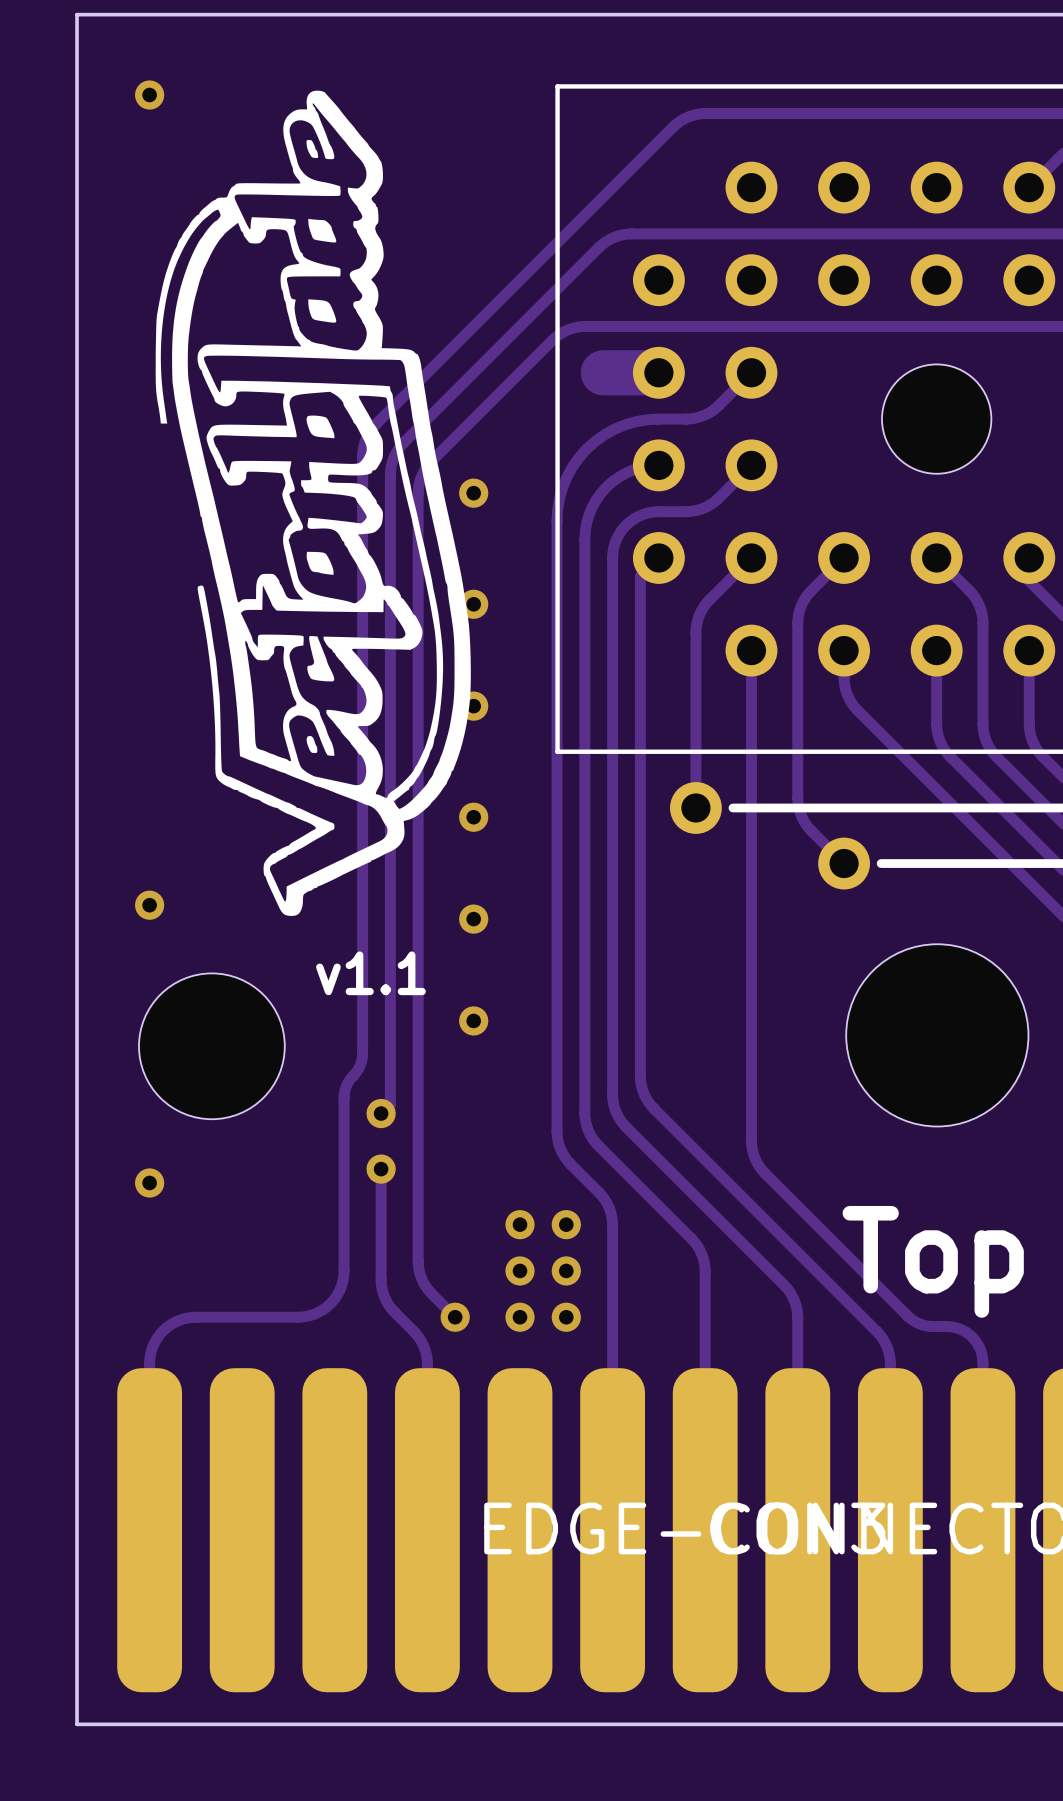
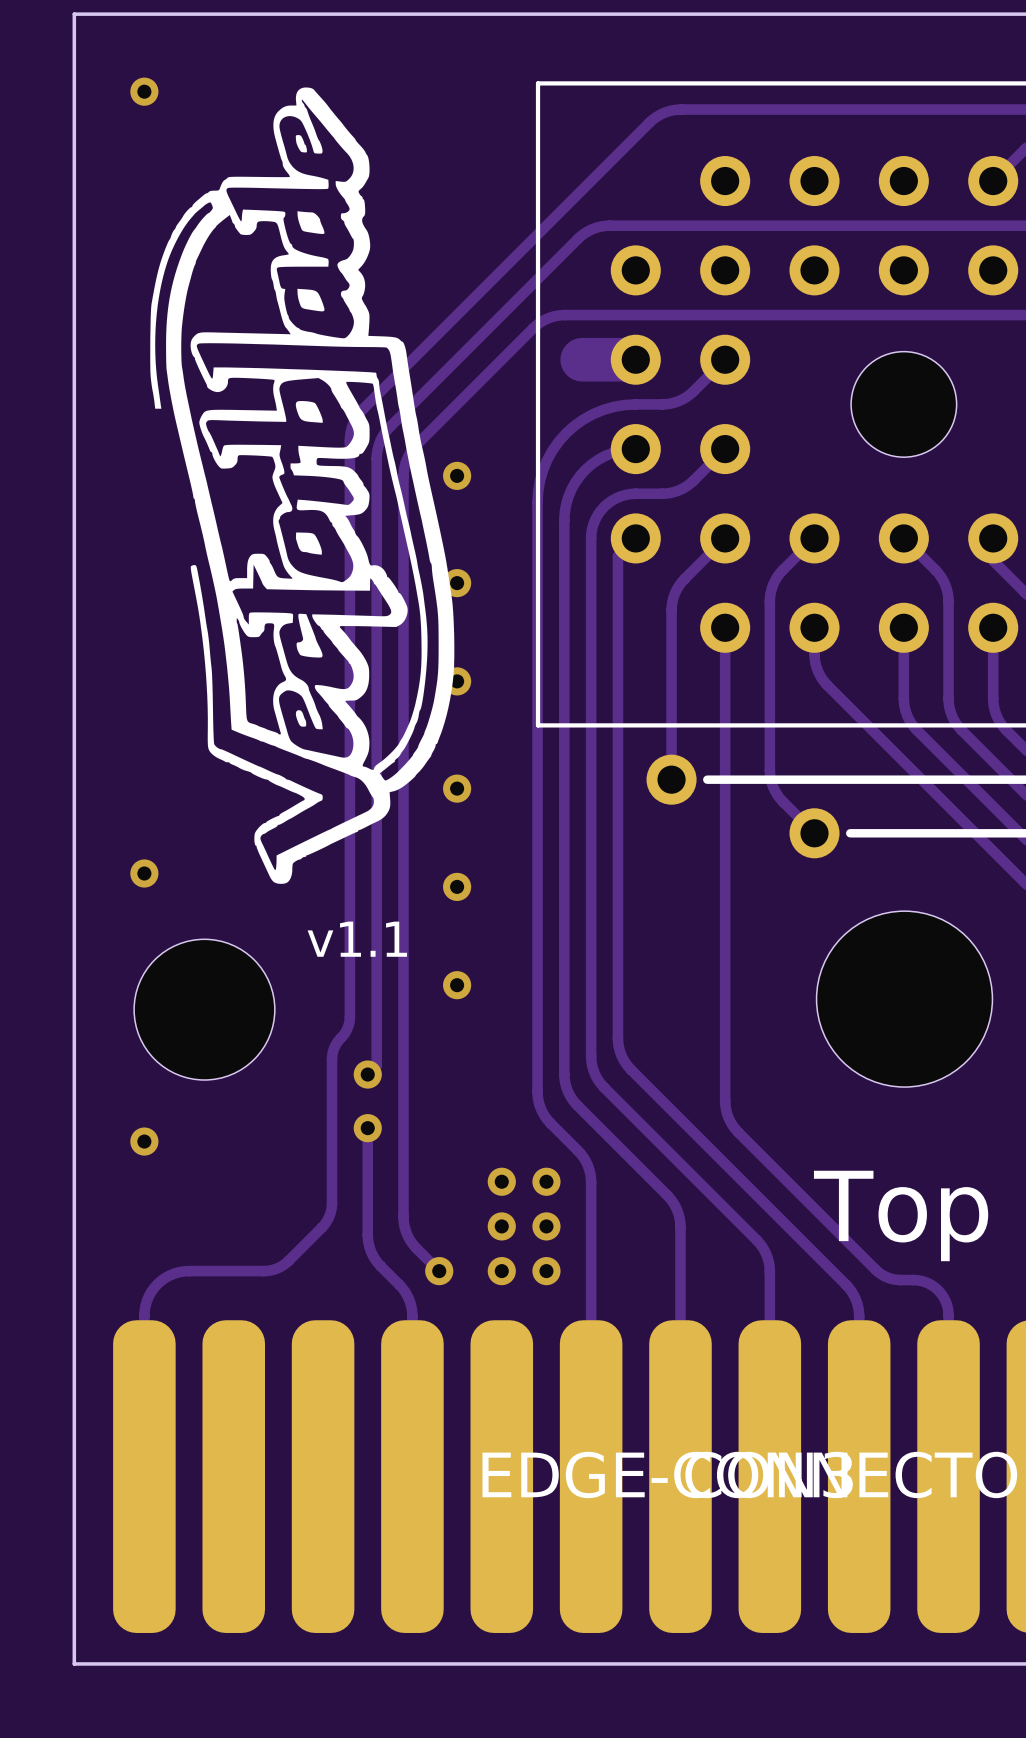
track: (344, 1246) (342, 1281) (339, 1291) (330, 1303) (317, 1312) (308, 1316) (273, 1317) -> (332, 1202) (330, 1213) (324, 1225) (288, 1260) (277, 1268) (263, 1271)

